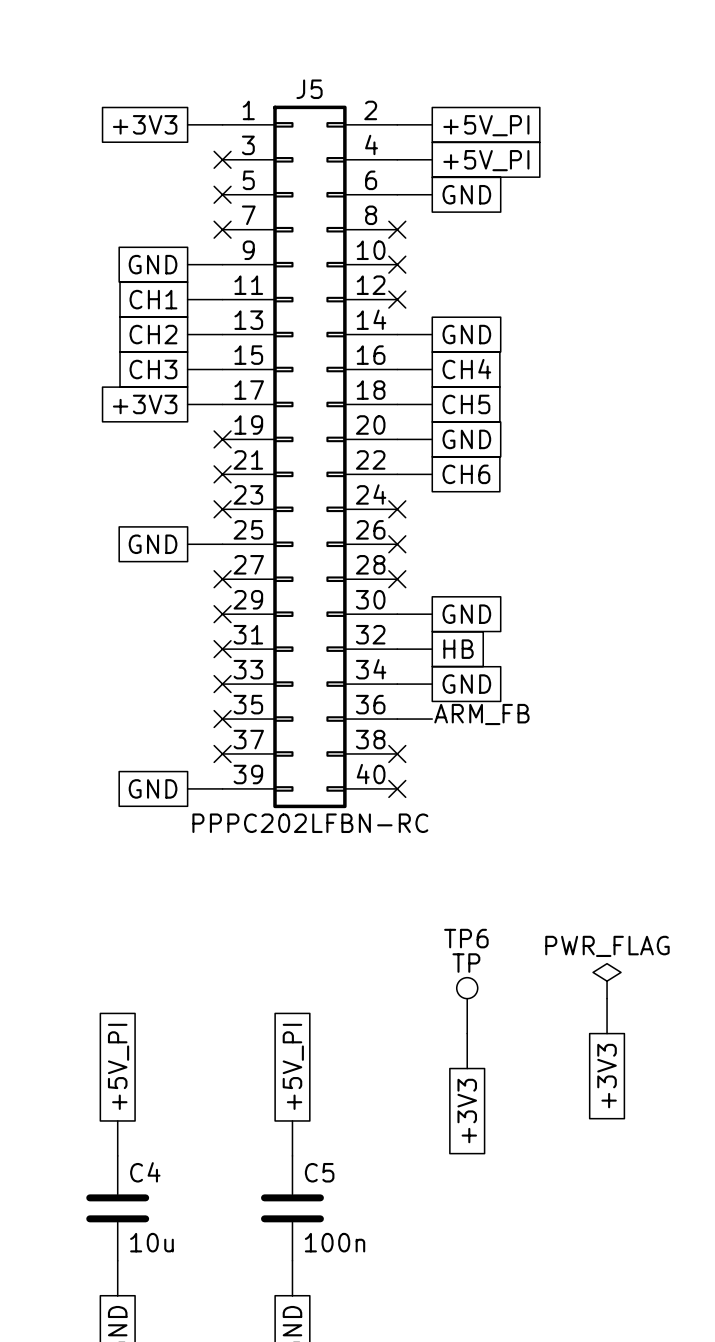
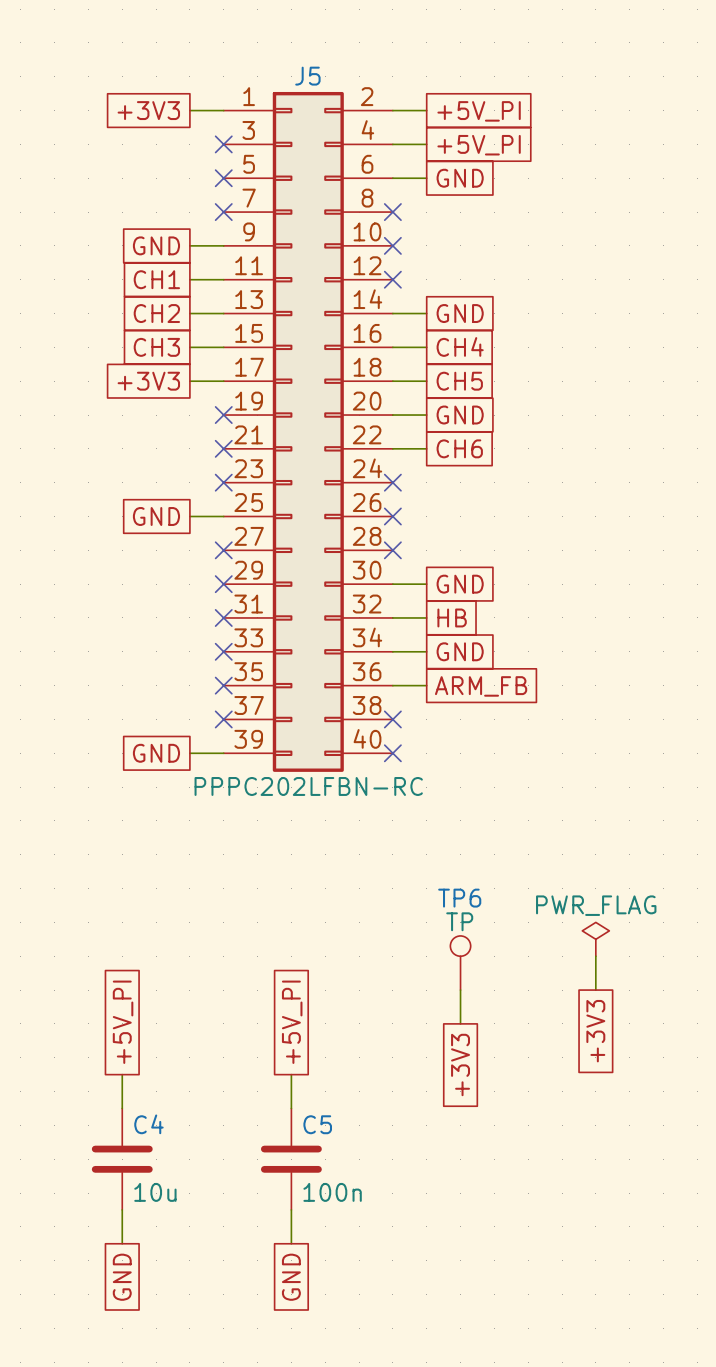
label: ARM_FB (481, 714) -> none
global label: none -> ARM_FB (481, 686)

